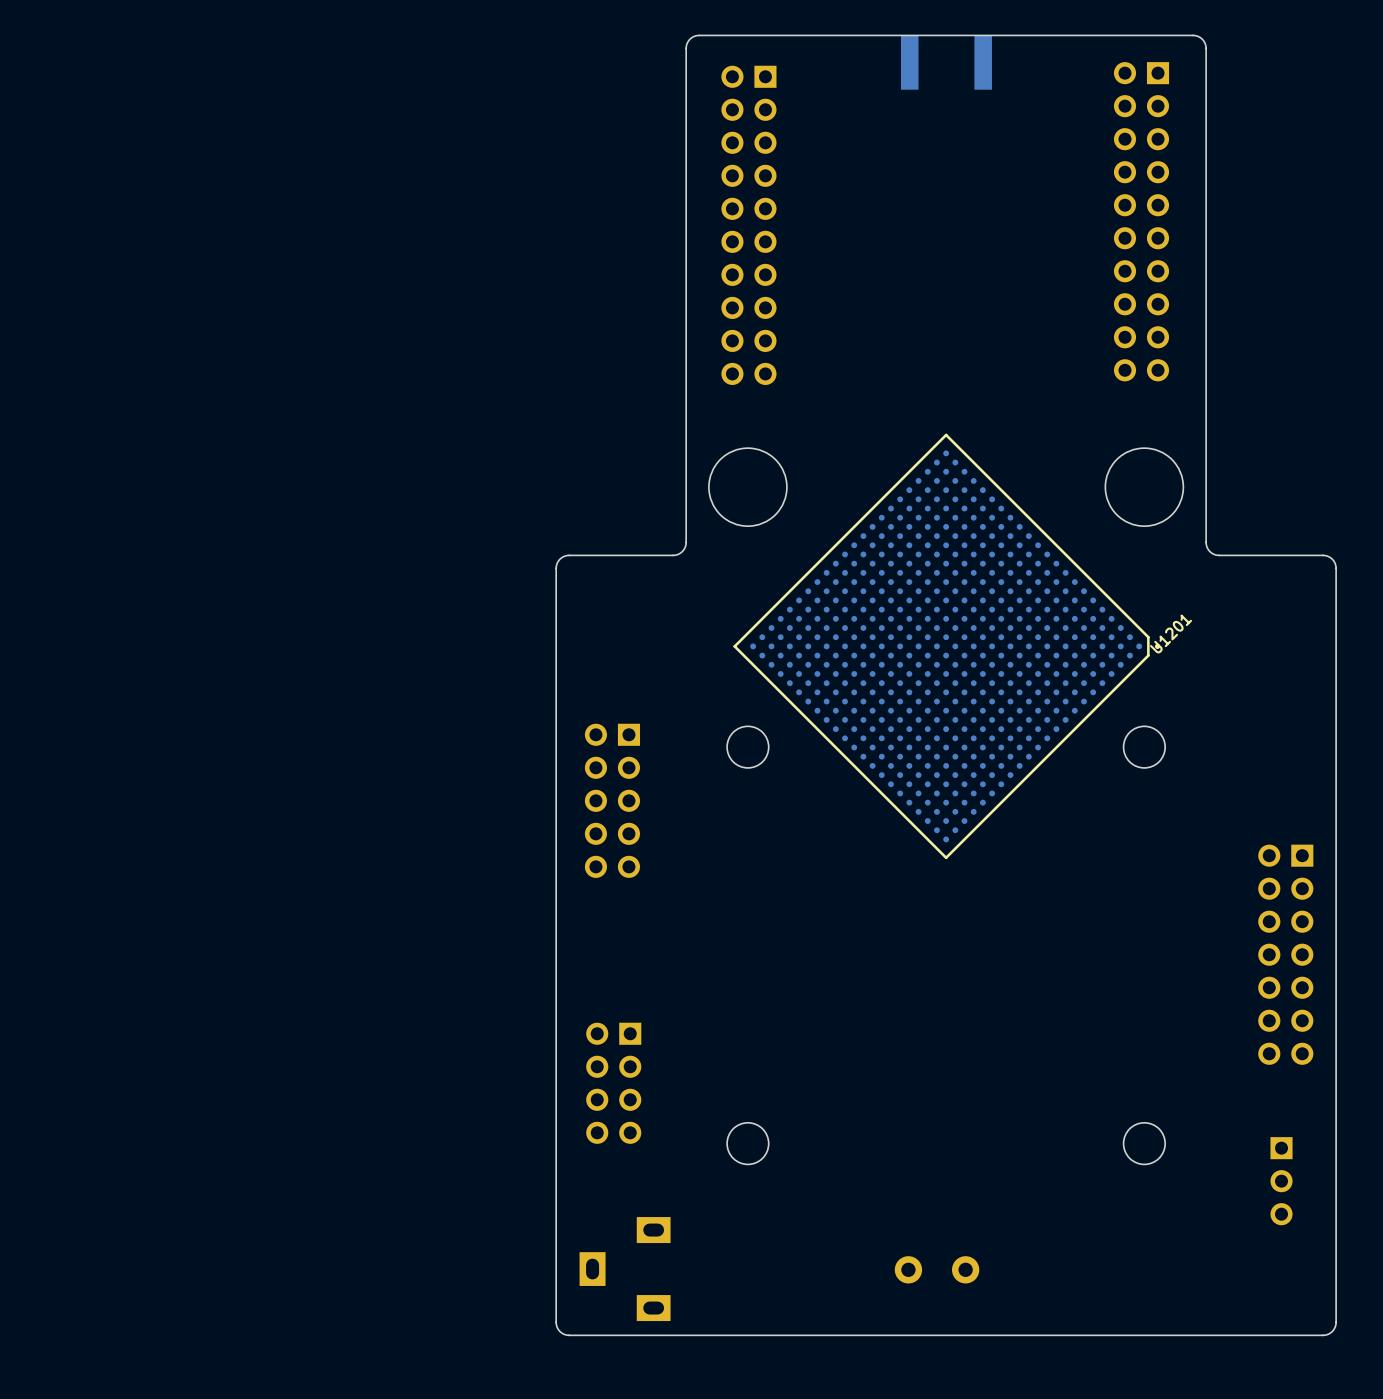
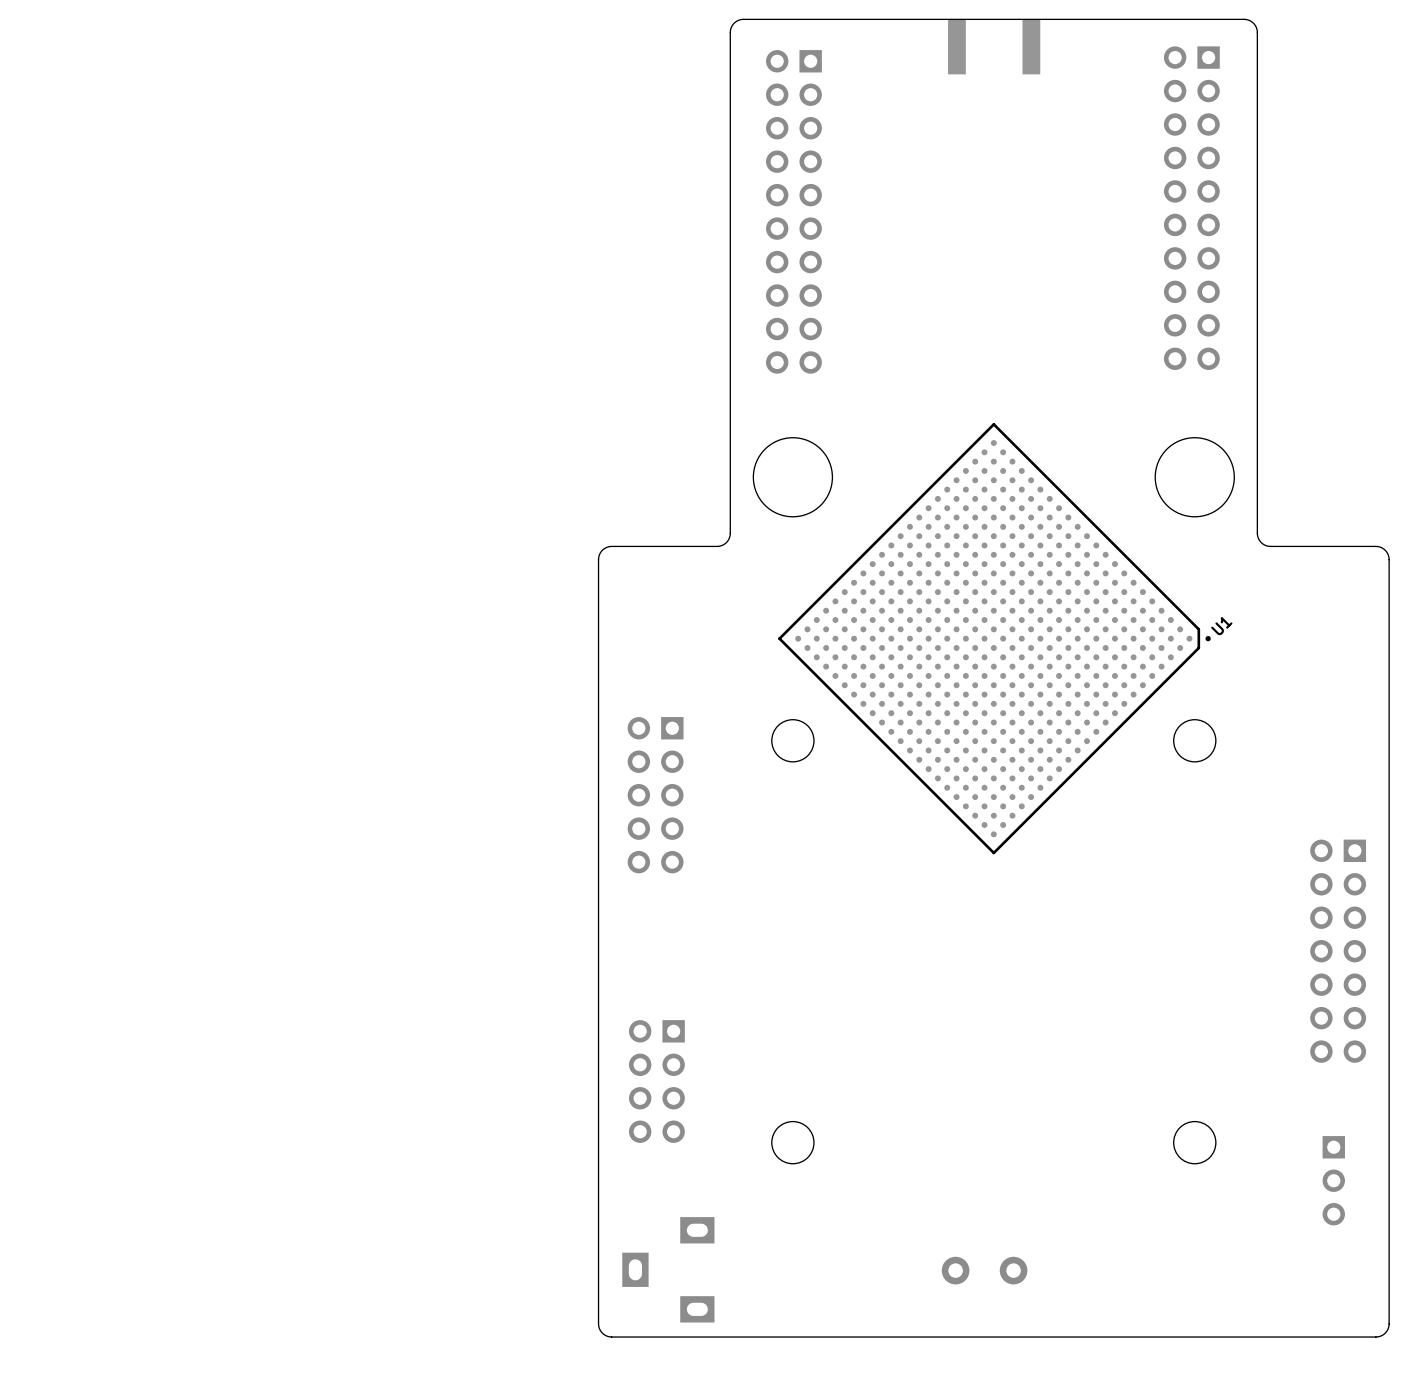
U1201 name: U1201 (1171, 633) -> U1 (1221, 626)

